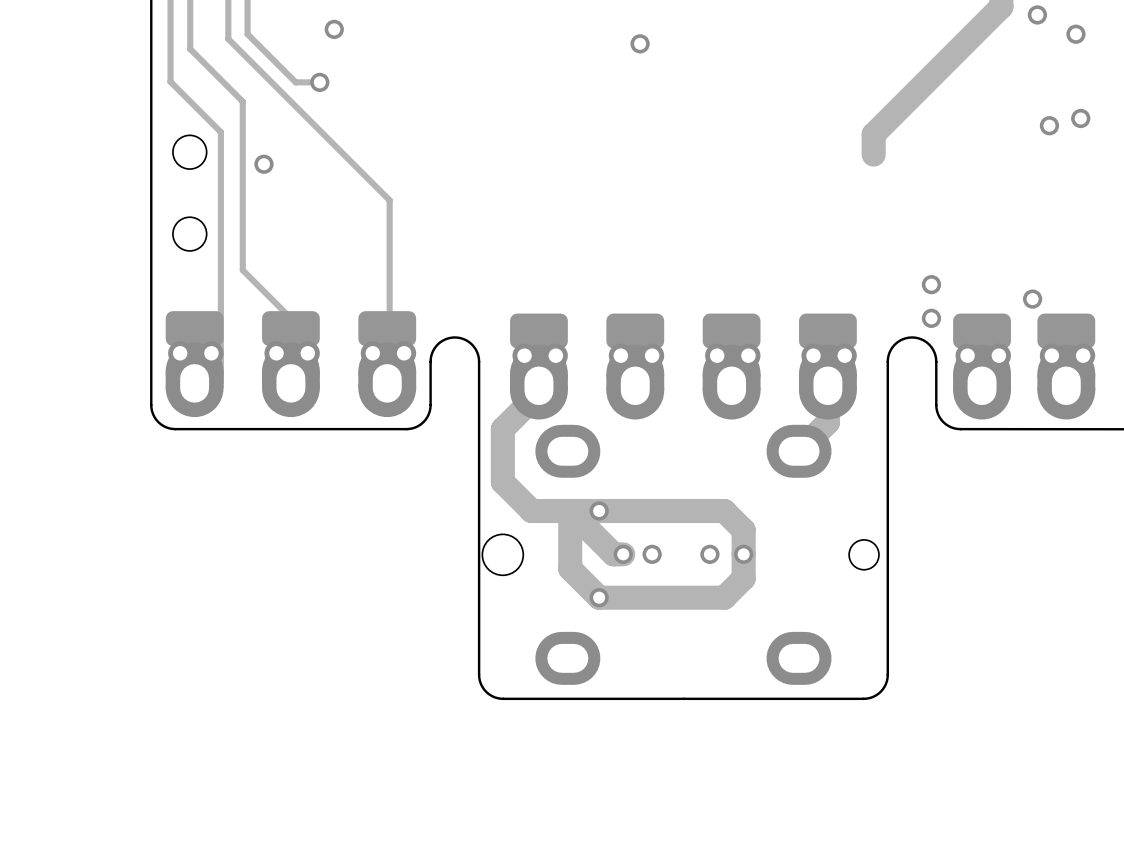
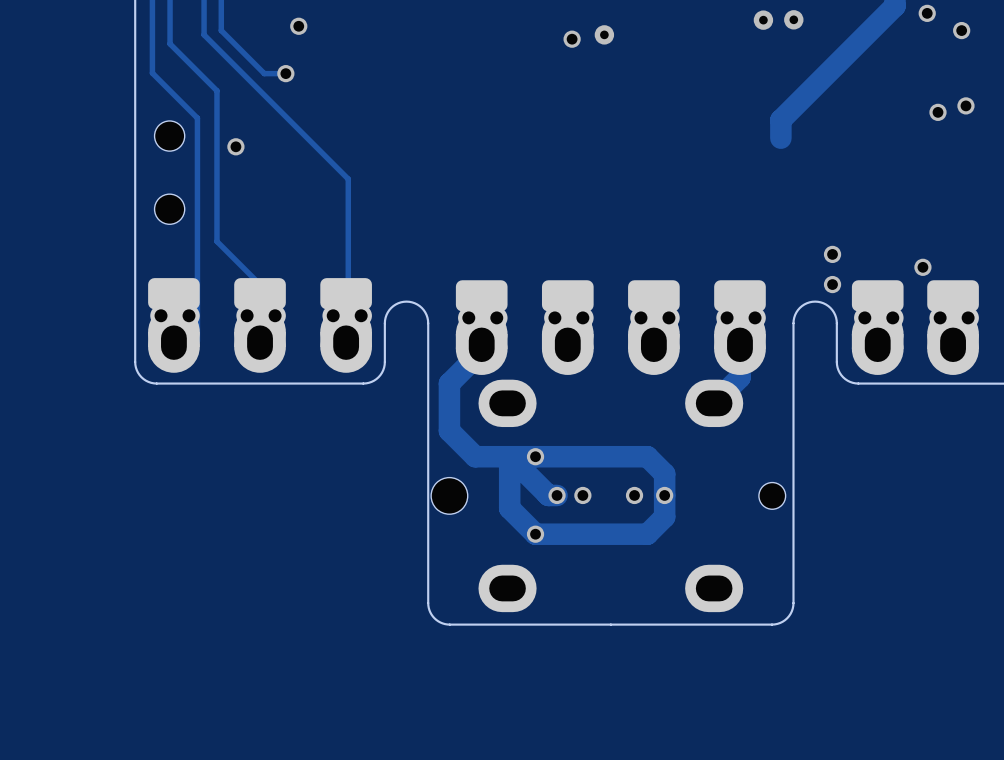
via: none -> (763, 20)
via: none -> (793, 19)
via: none -> (604, 34)

